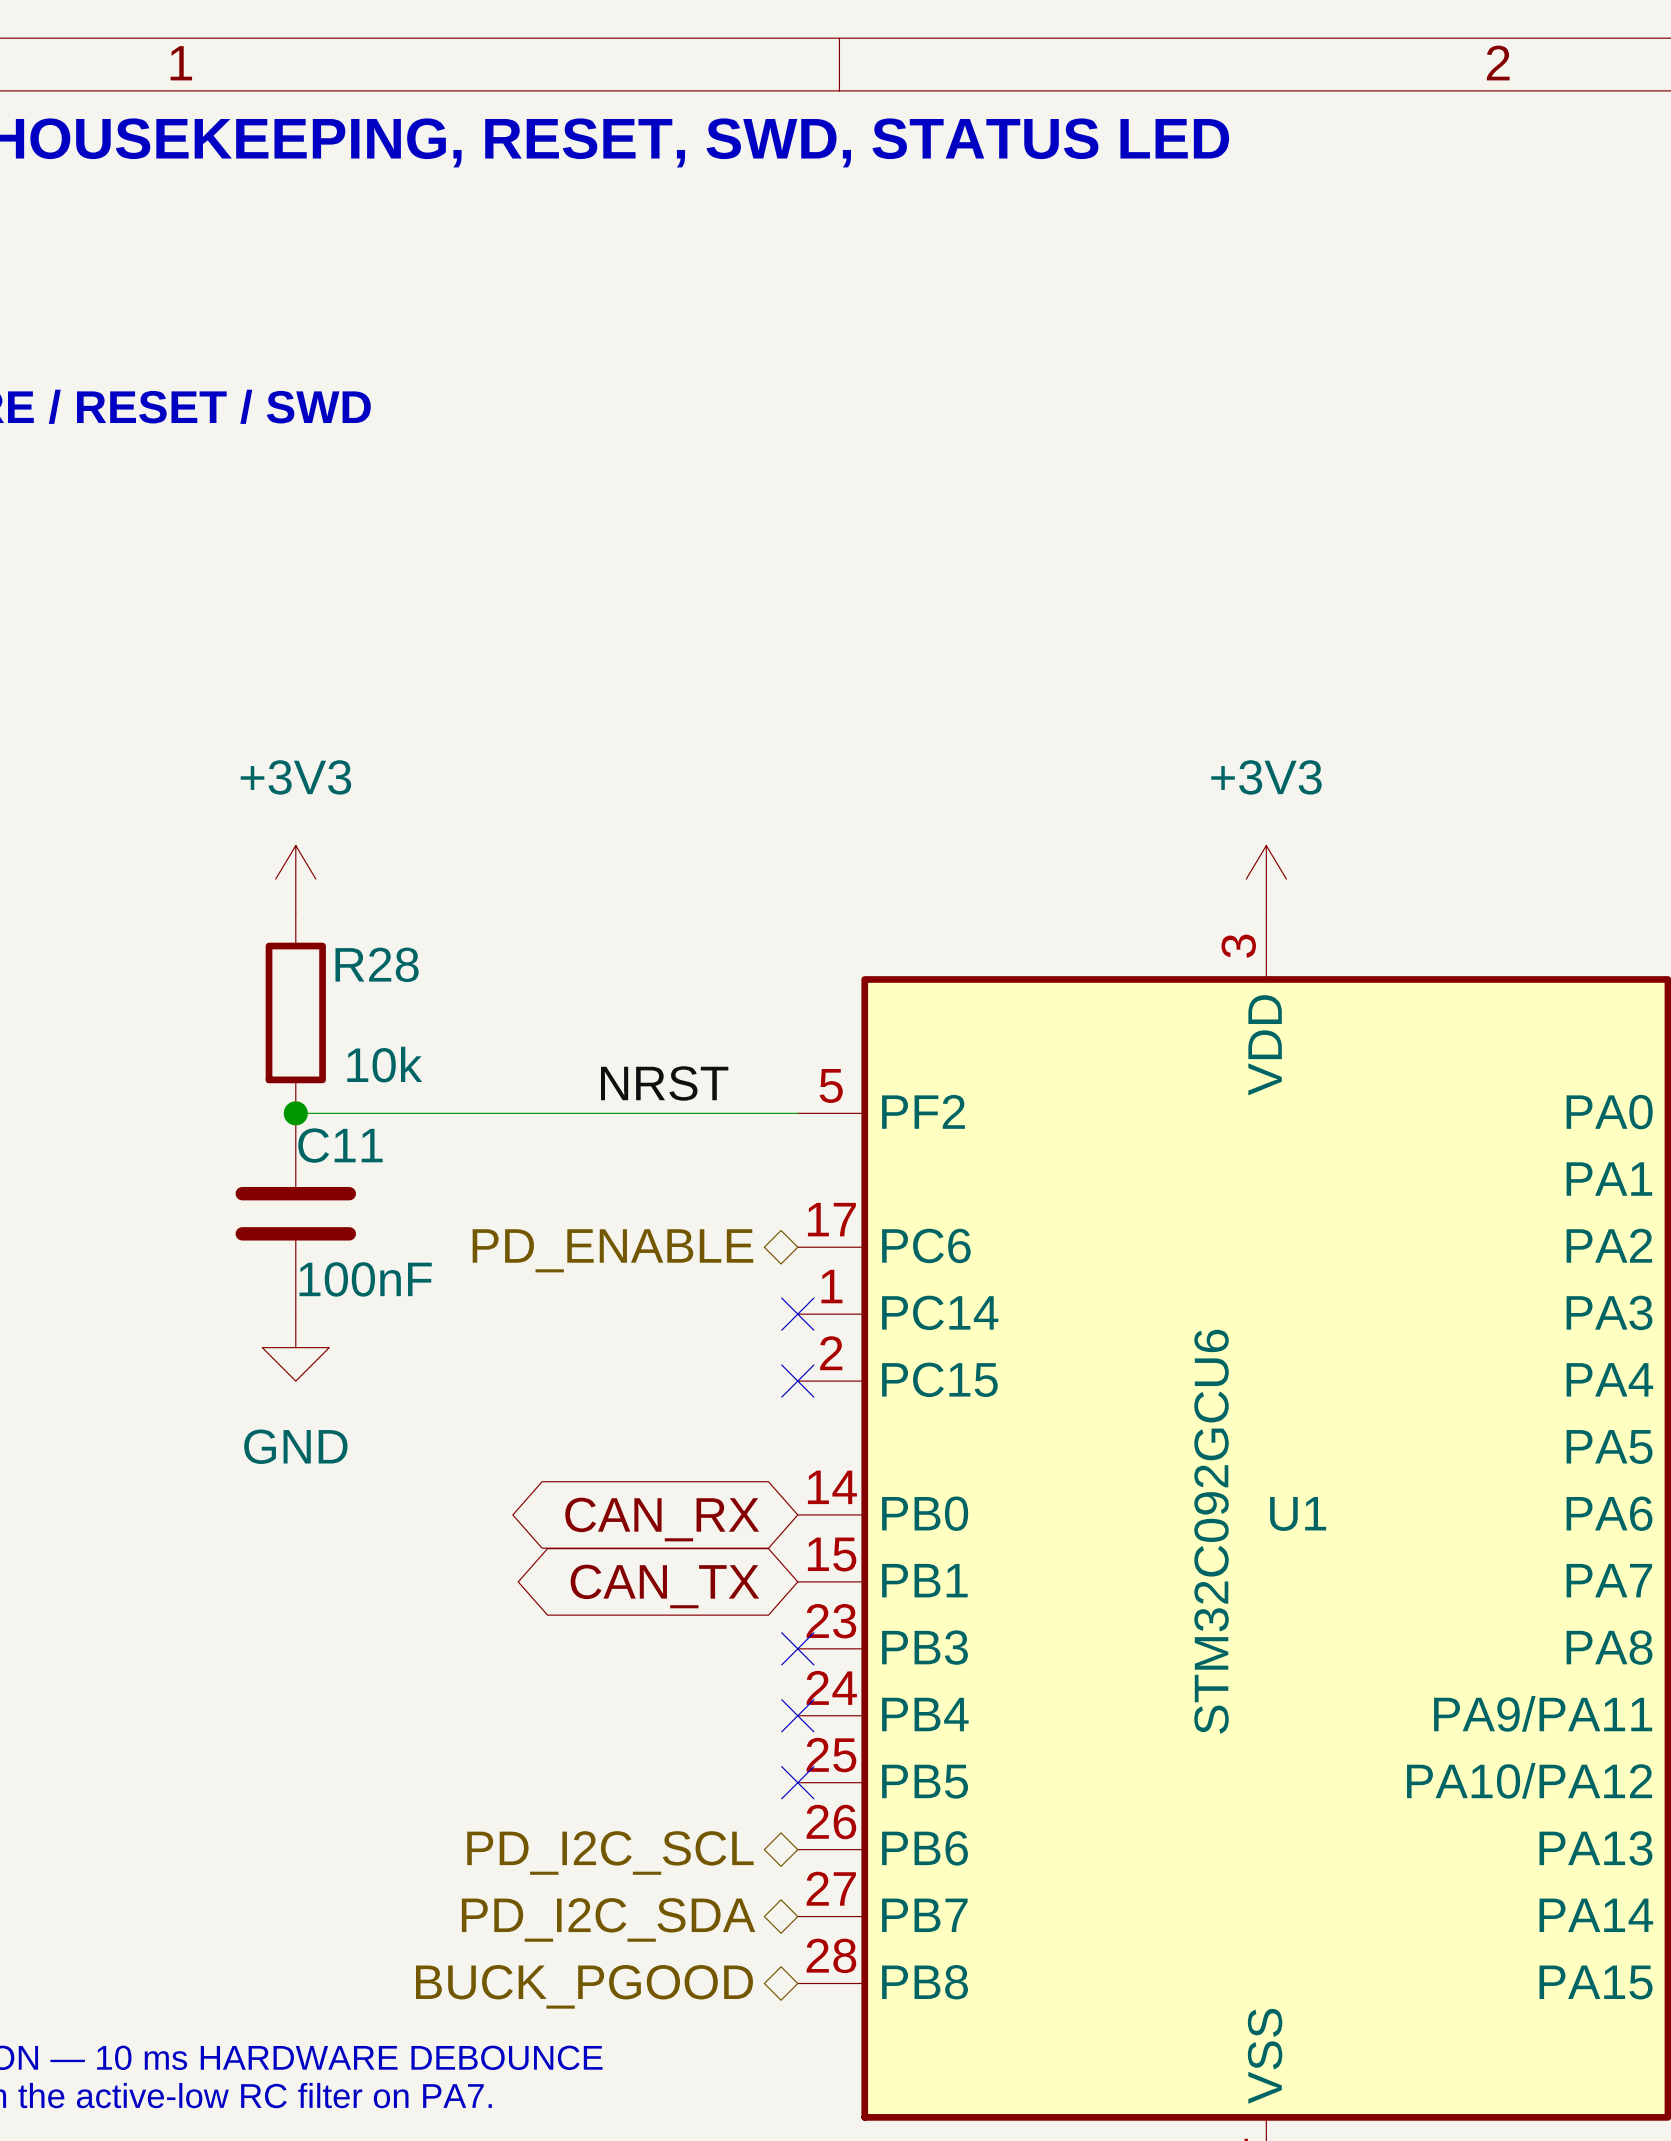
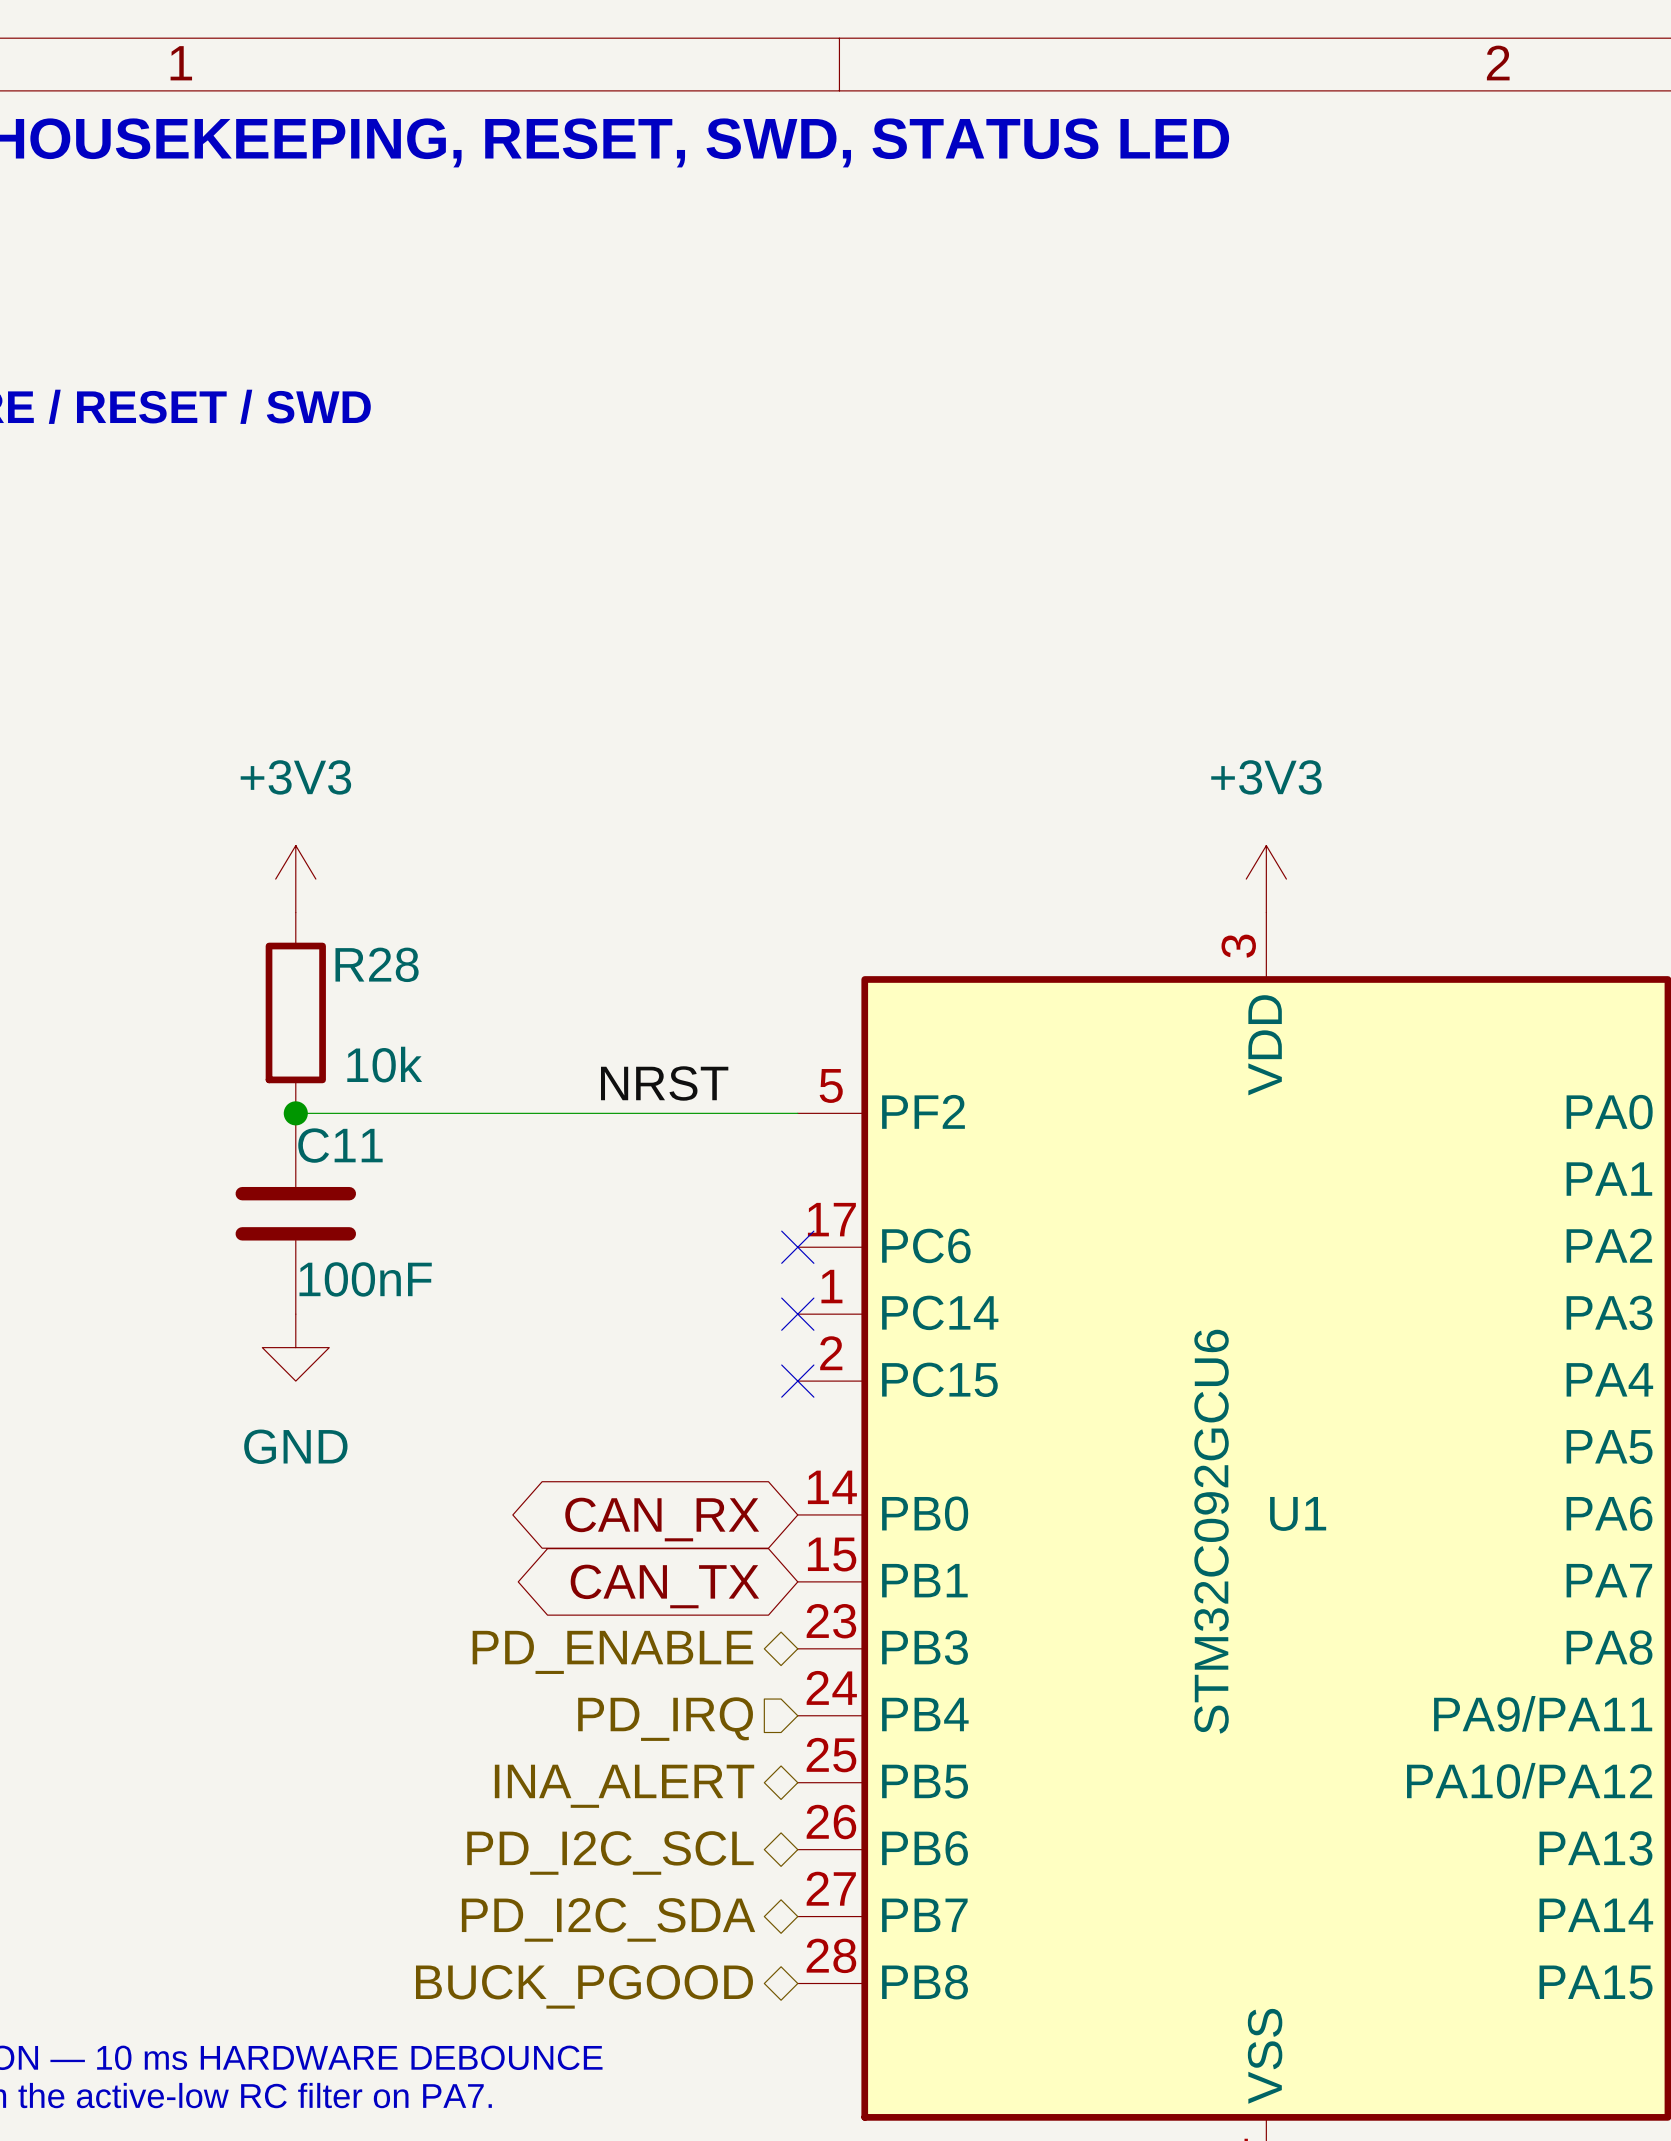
no-connect mark: none -> (797, 1247)
hierarchical label position: PD_ENABLE (612, 1250) -> PD_ENABLE (612, 1652)
no-connect mark: (797, 1648) -> none
no-connect mark: (797, 1715) -> none
hierarchical label: none -> PD_IRQ (665, 1719)
no-connect mark: (797, 1782) -> none
hierarchical label: none -> INA_ALERT (624, 1786)

